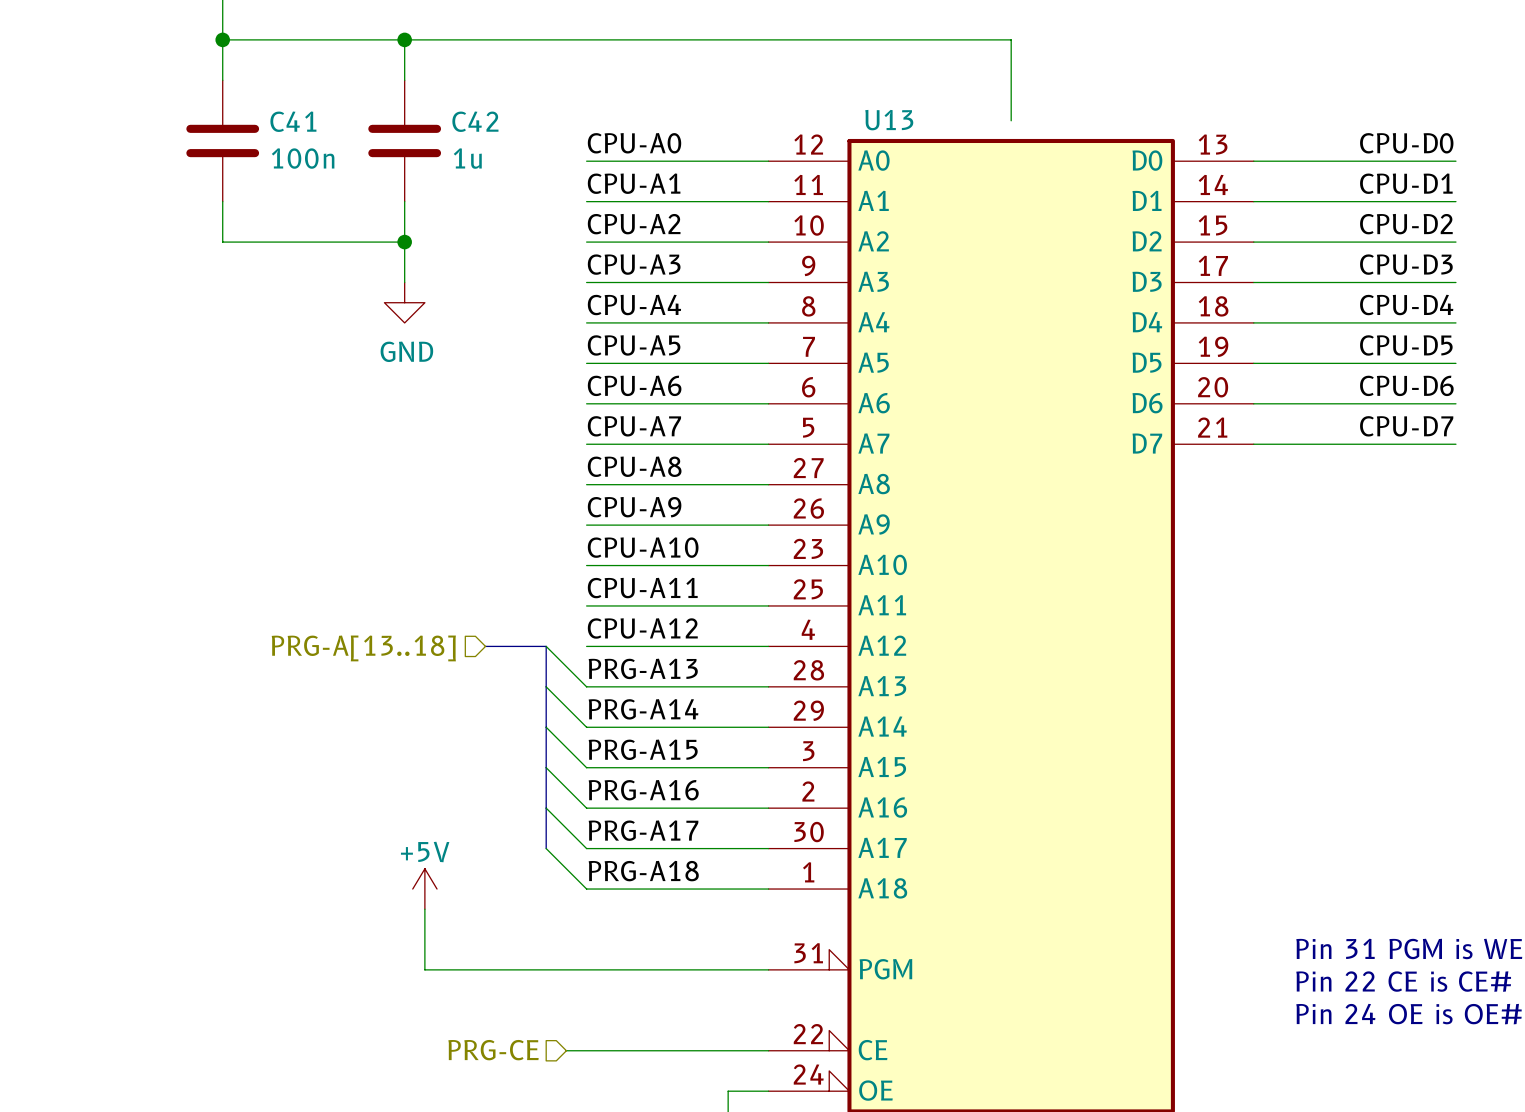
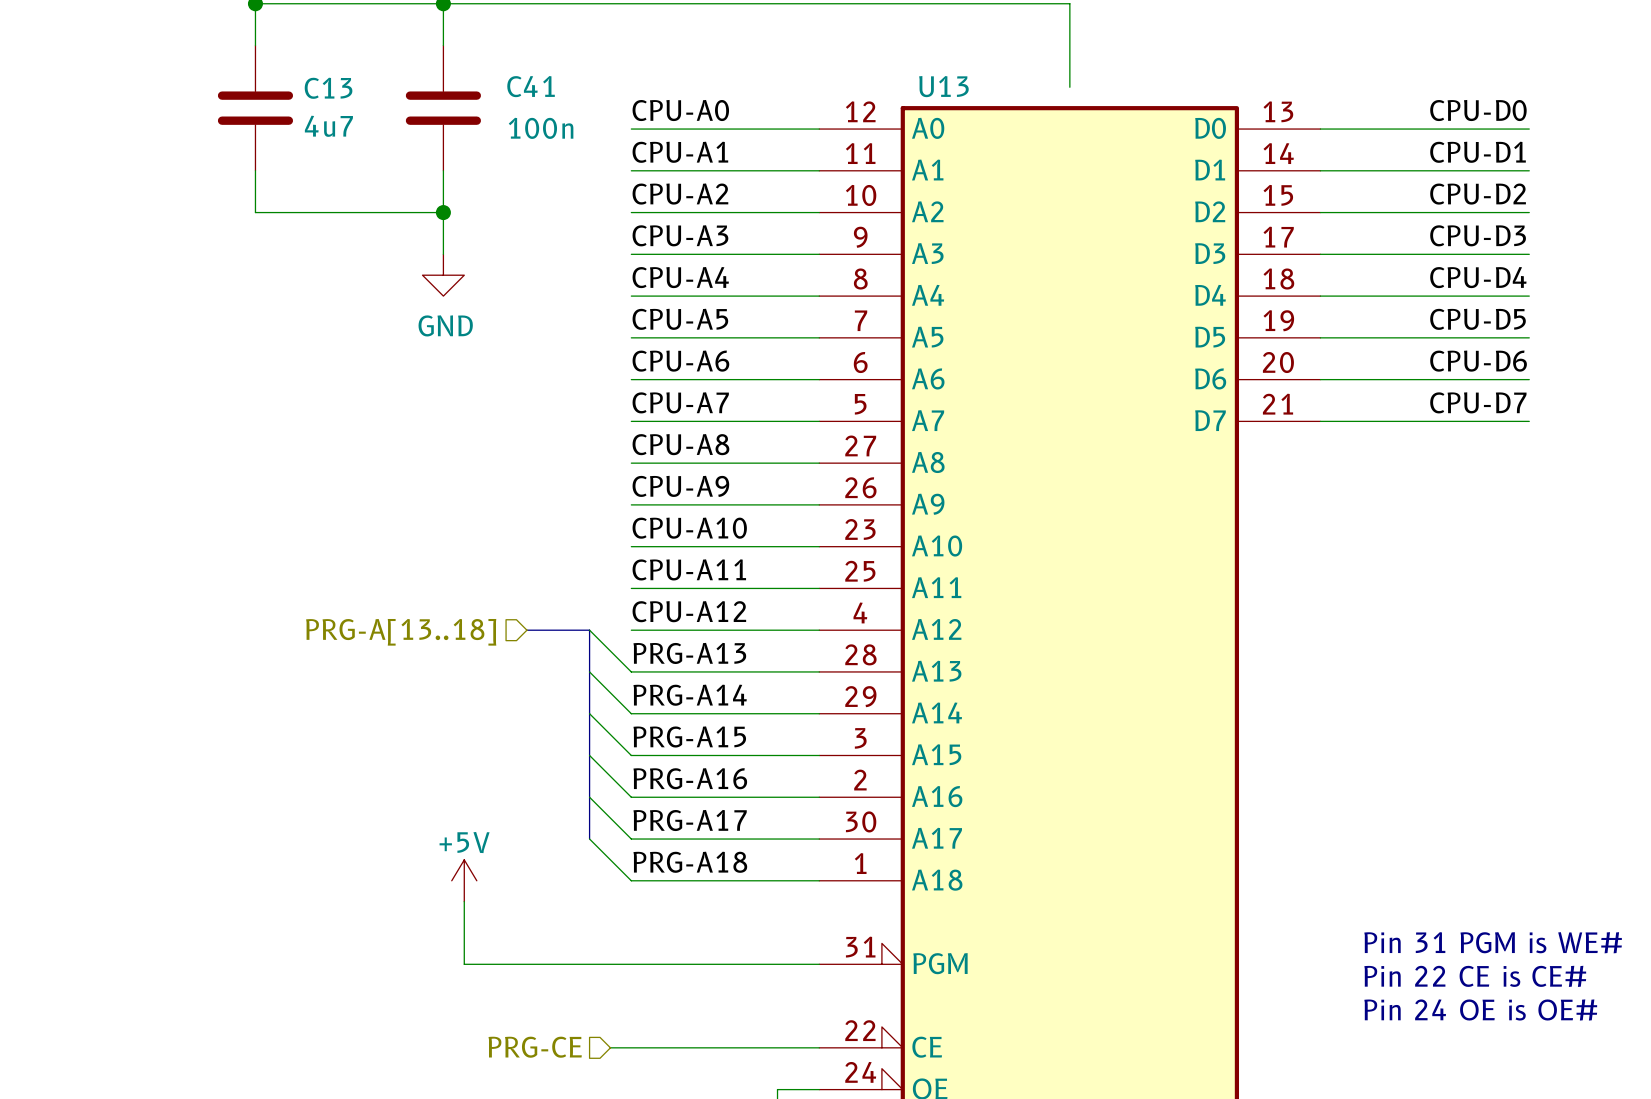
C41 name: C41 (293, 121) -> C13 (328, 88)
C42 name: C42 (475, 121) -> C41 (531, 86)
C41 value: 100n (303, 158) -> 4u7 (328, 126)
C42 value: 1u (467, 158) -> 100n (541, 128)

